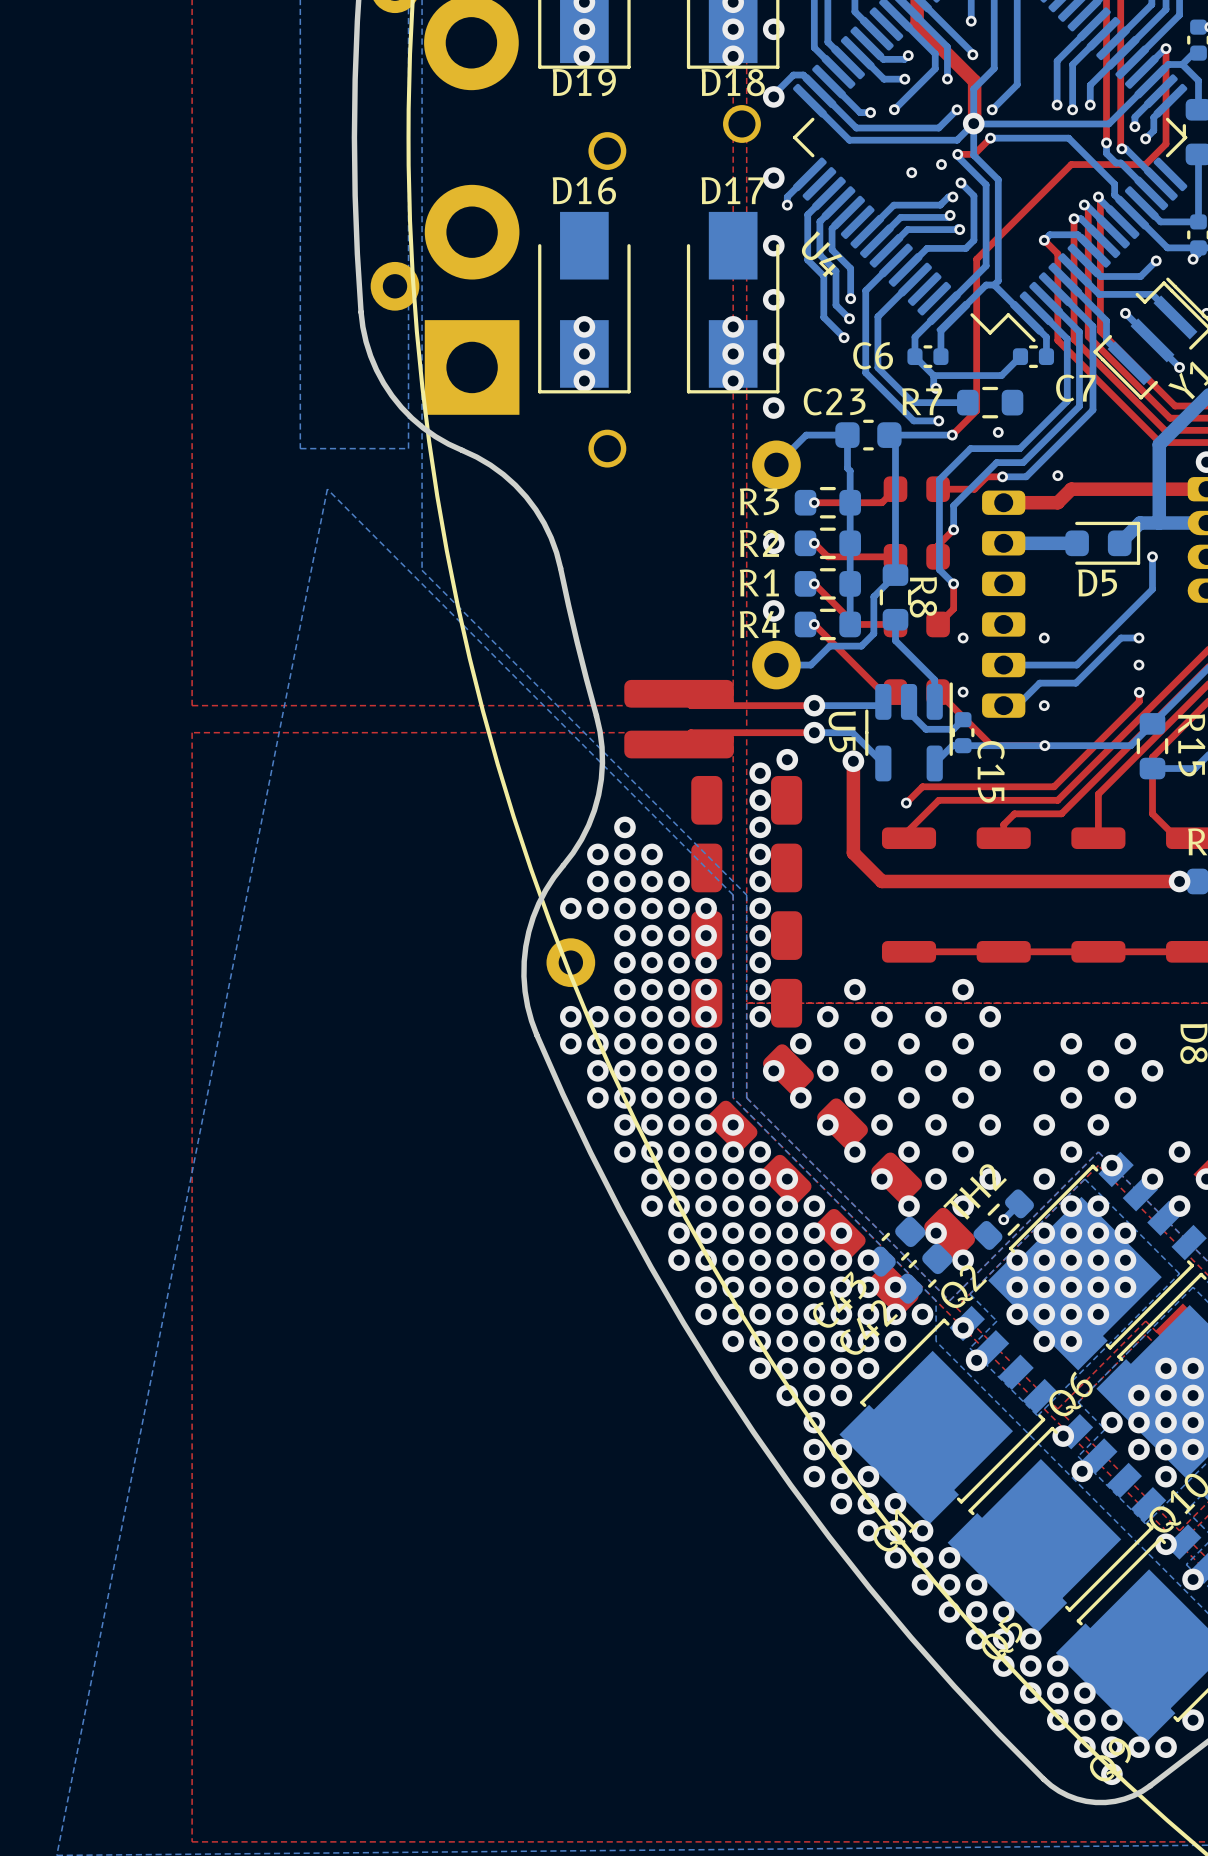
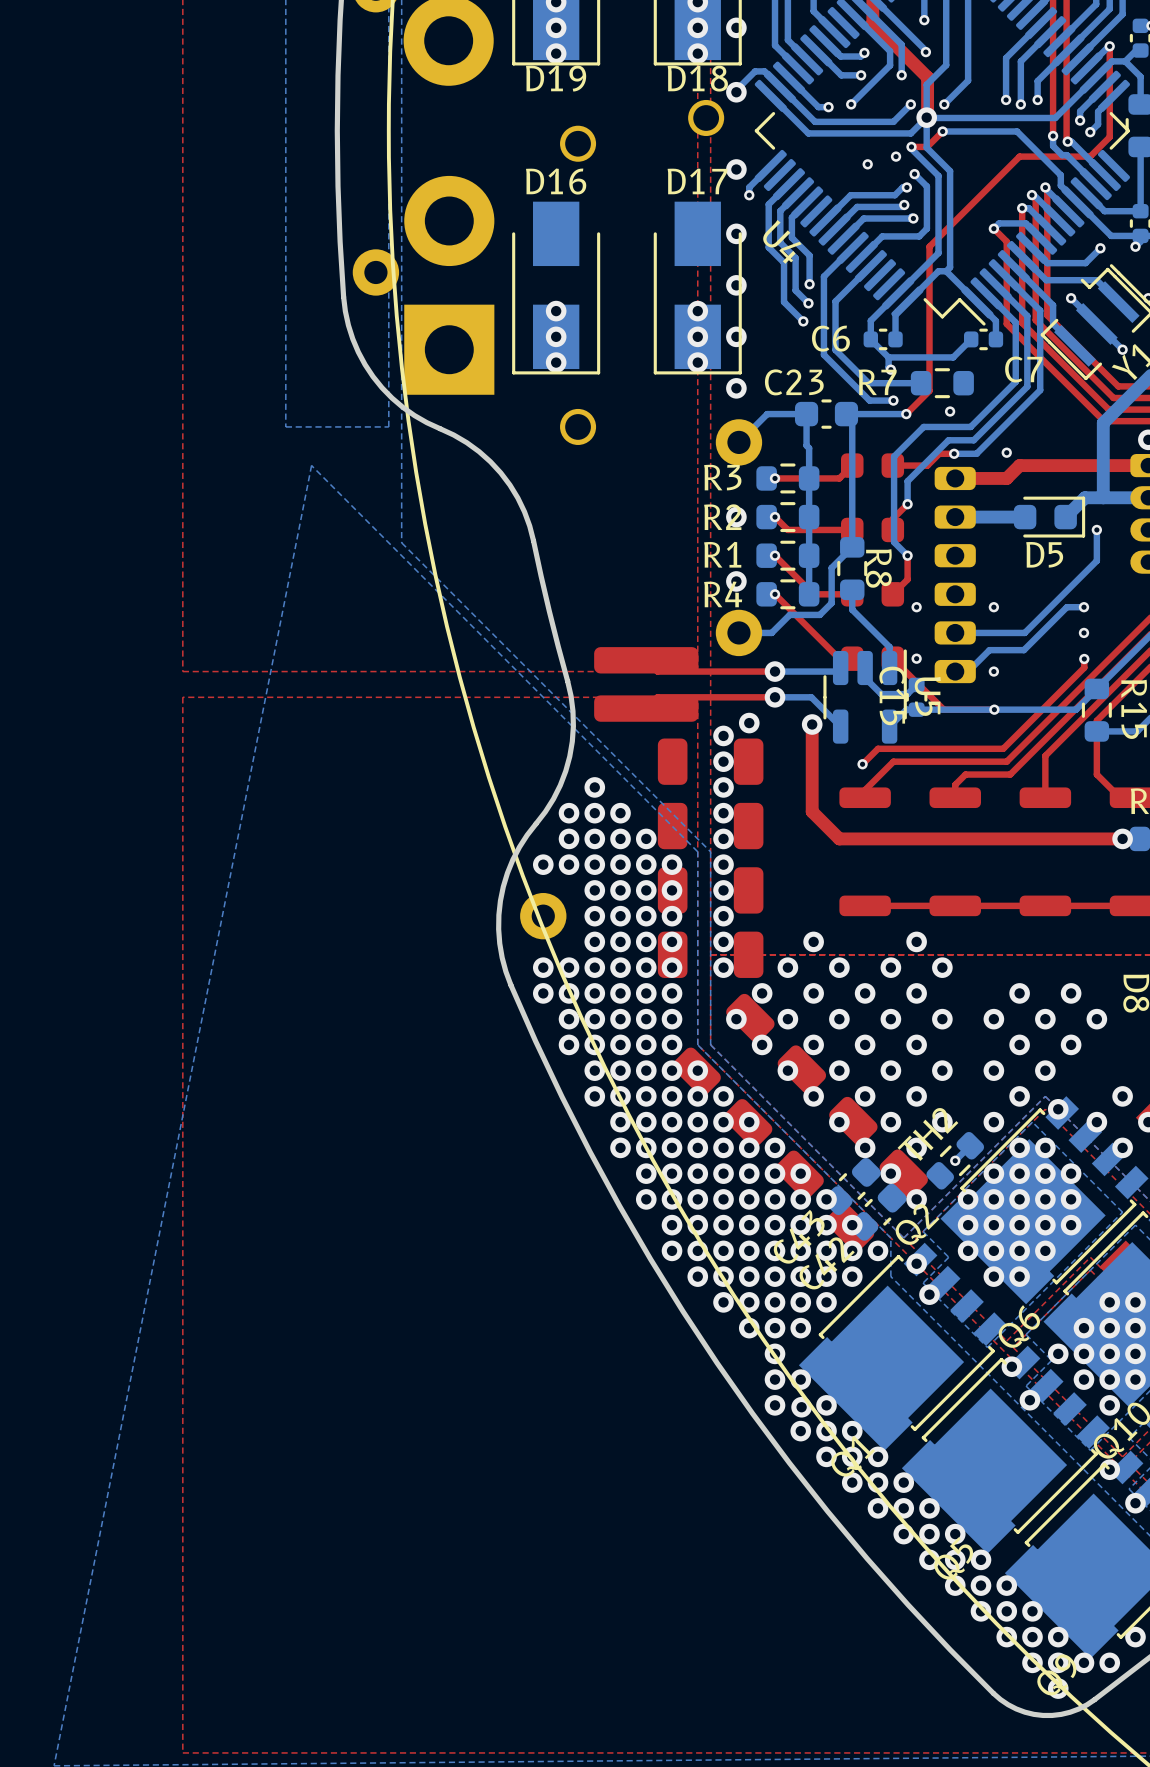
U5 name position: U5 (842, 731) -> U5 (927, 696)
C15 name position: C15 (991, 771) -> C15 (892, 695)

